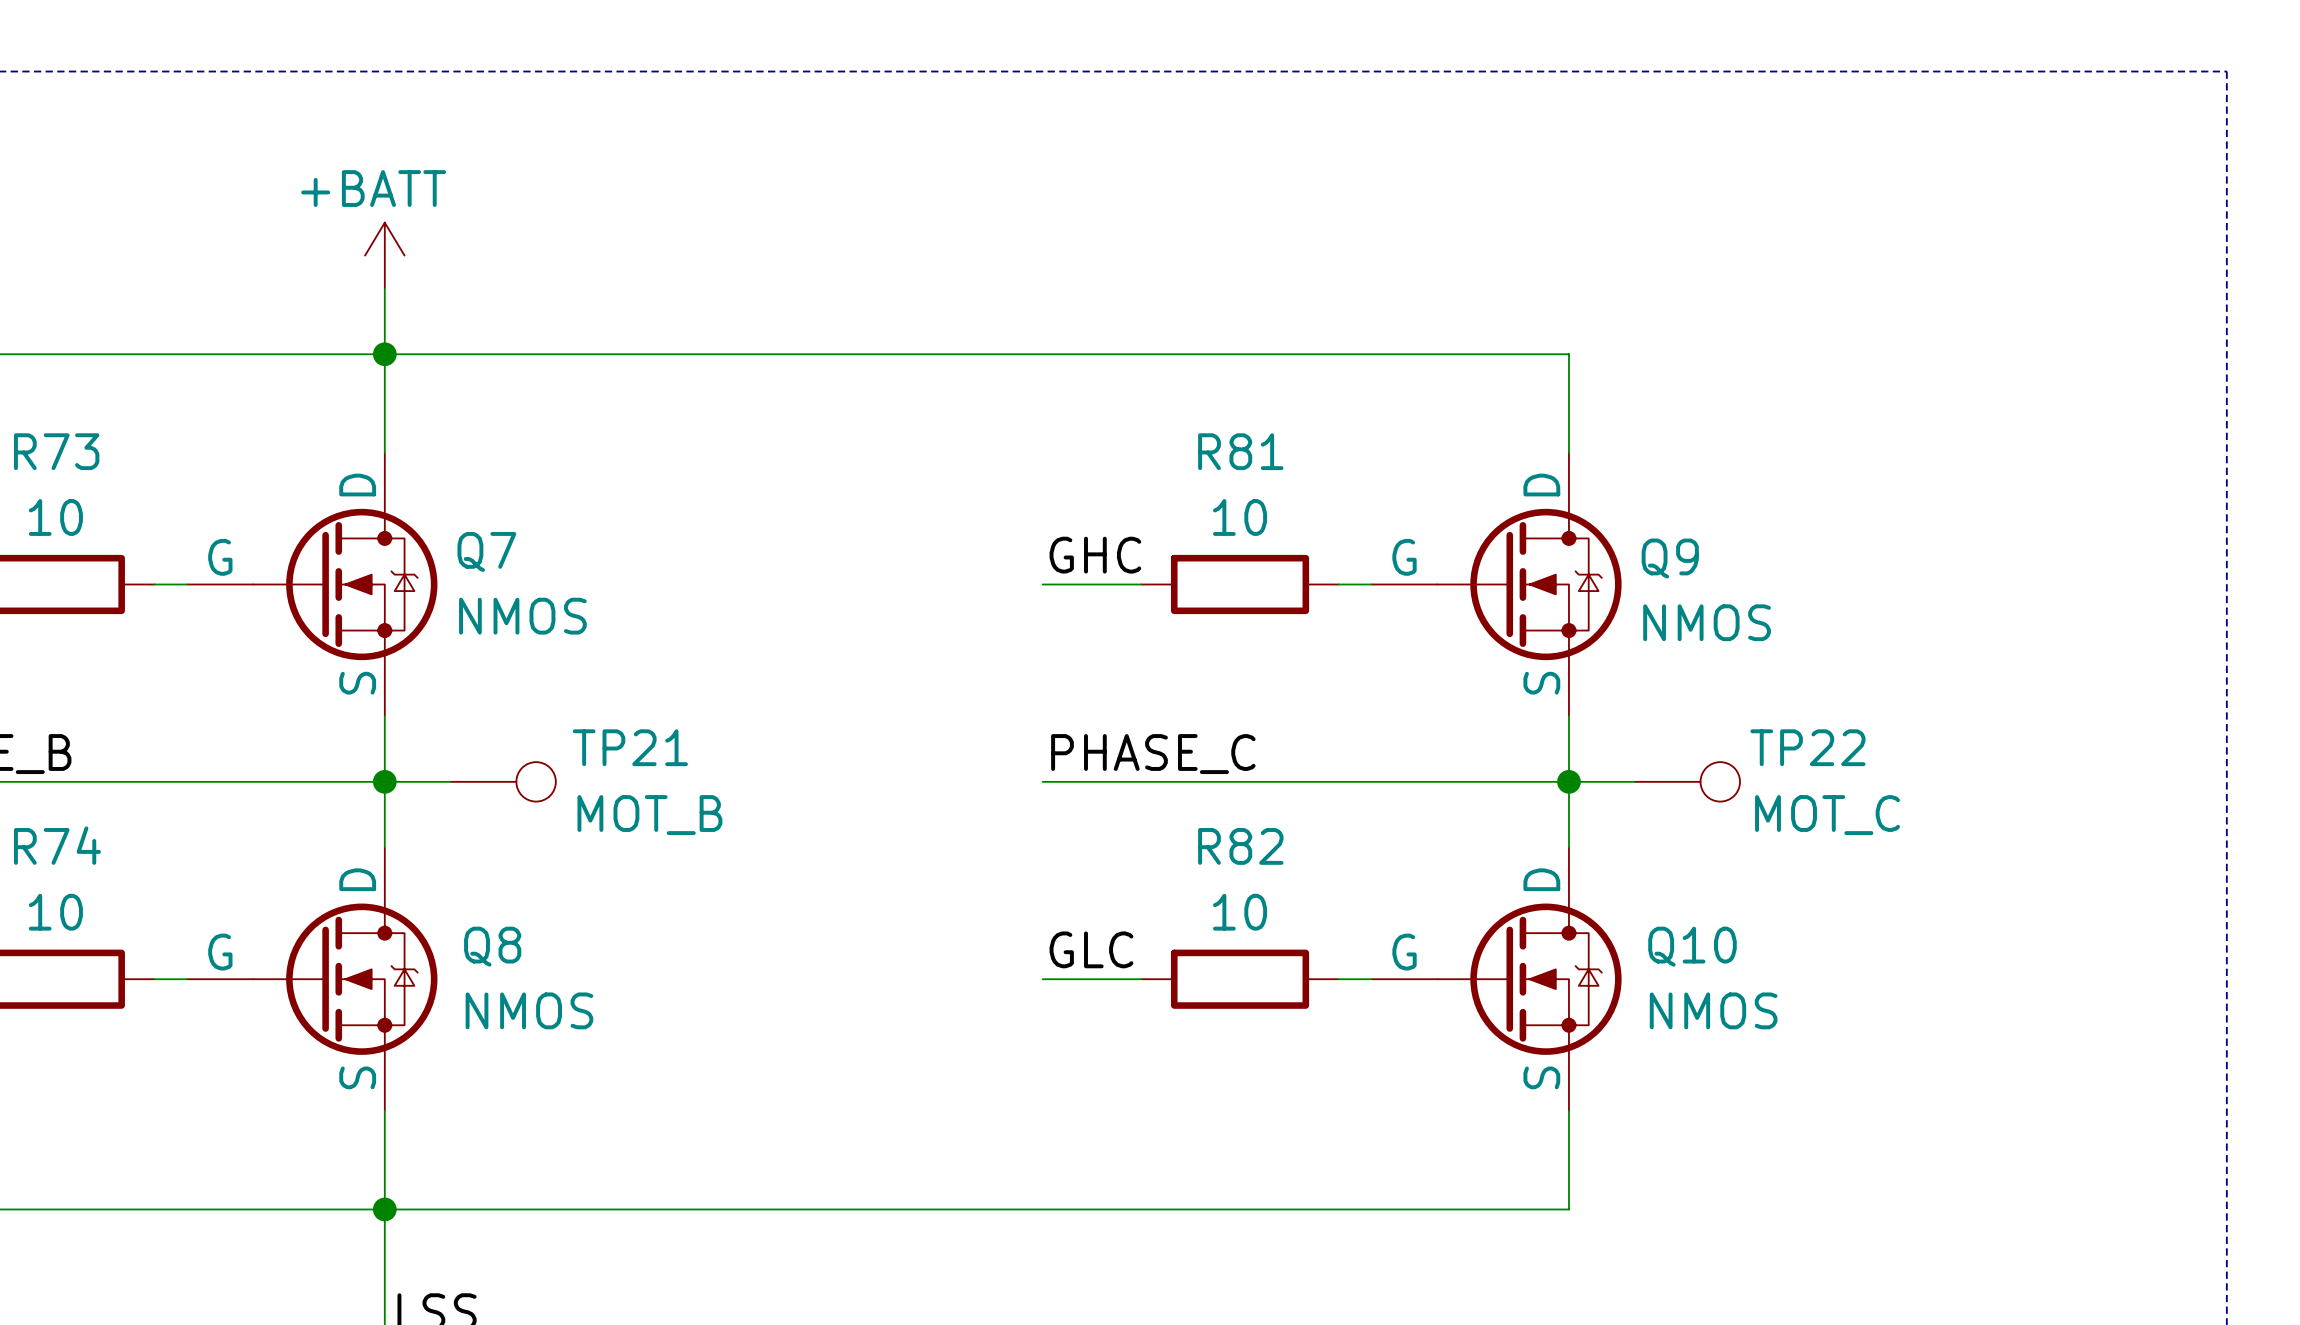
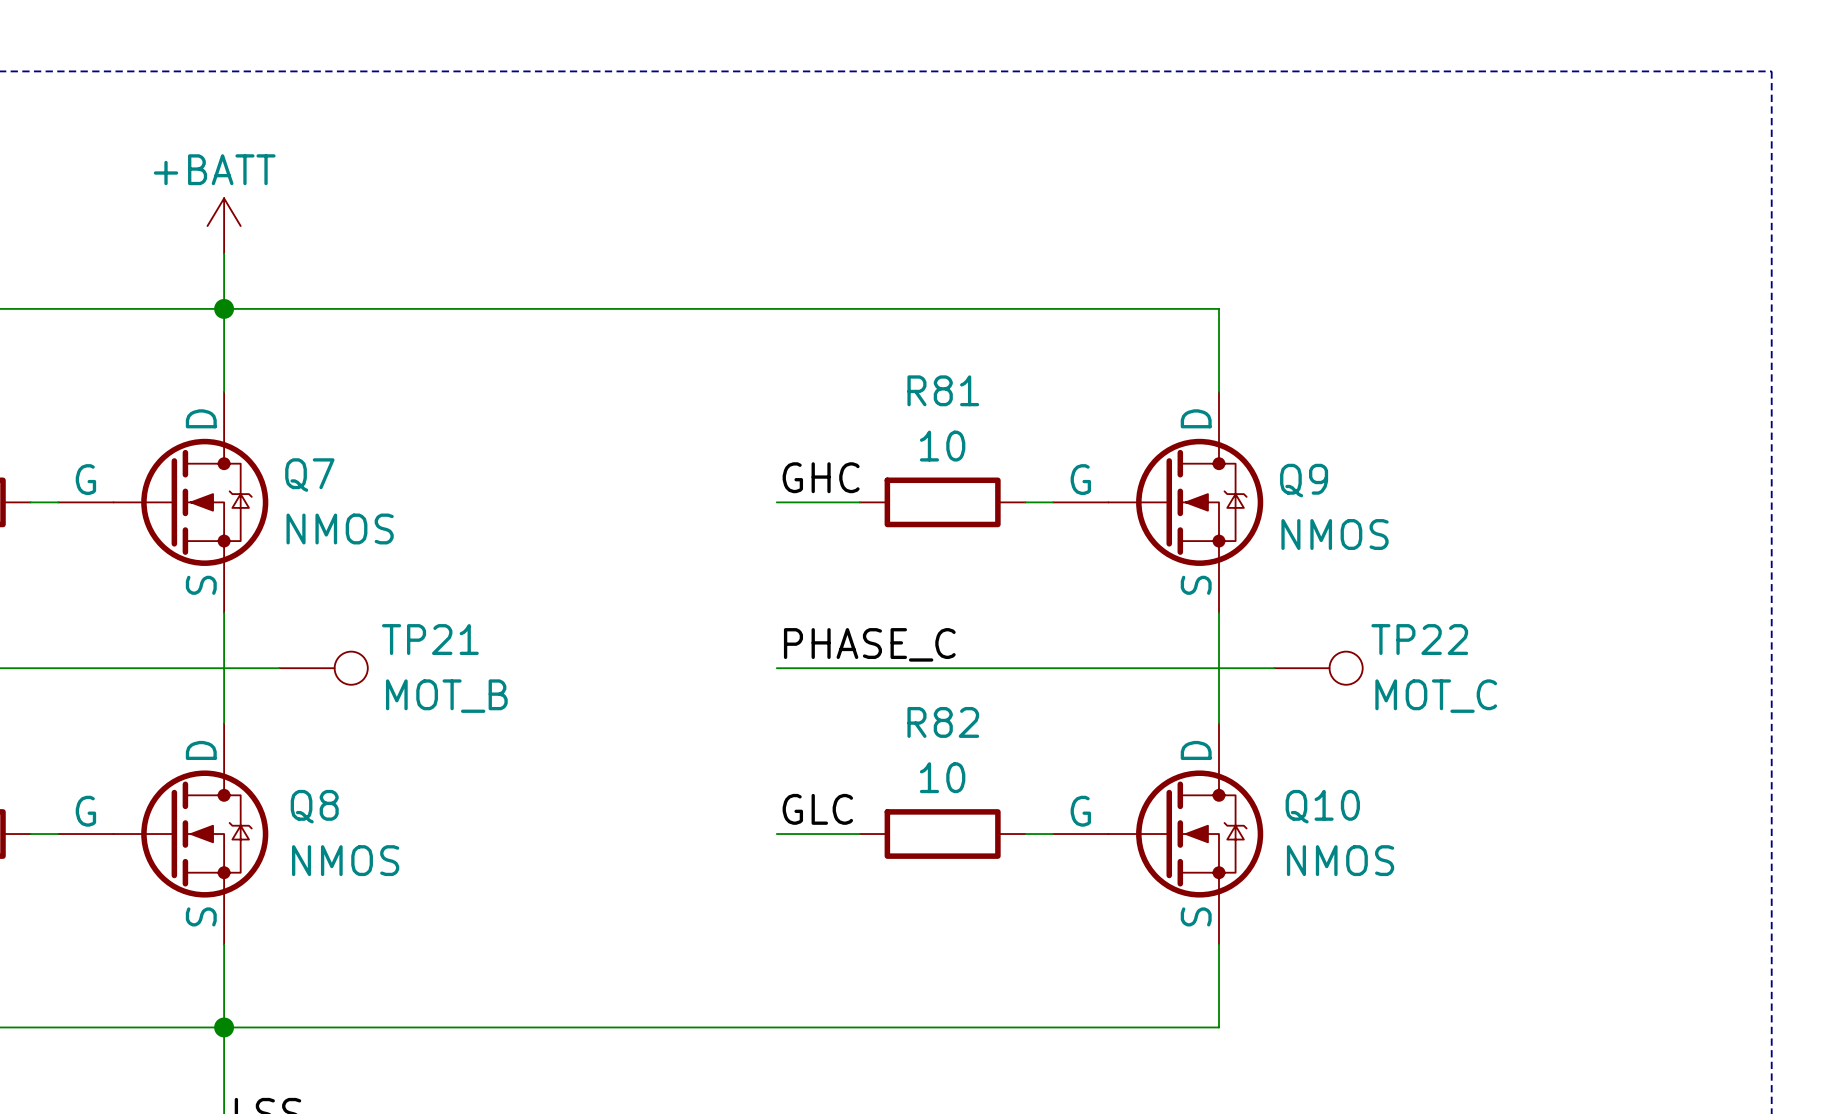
junction: (384, 781) -> none
junction: (1568, 781) -> none

